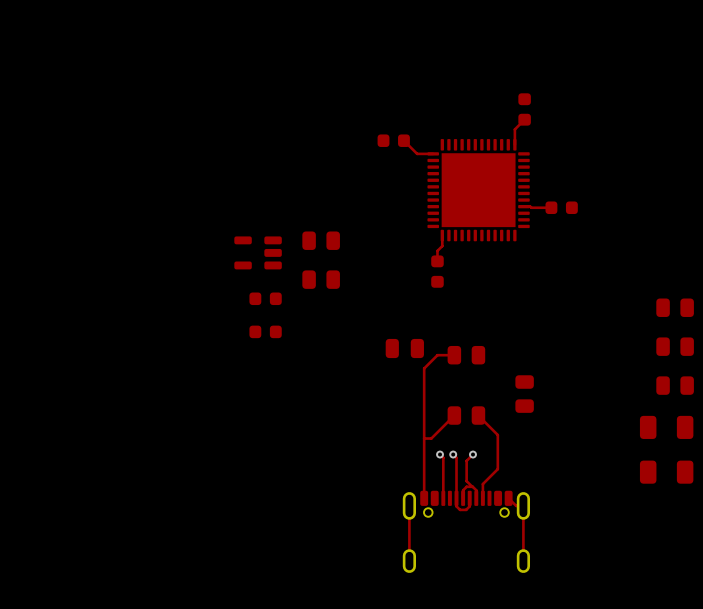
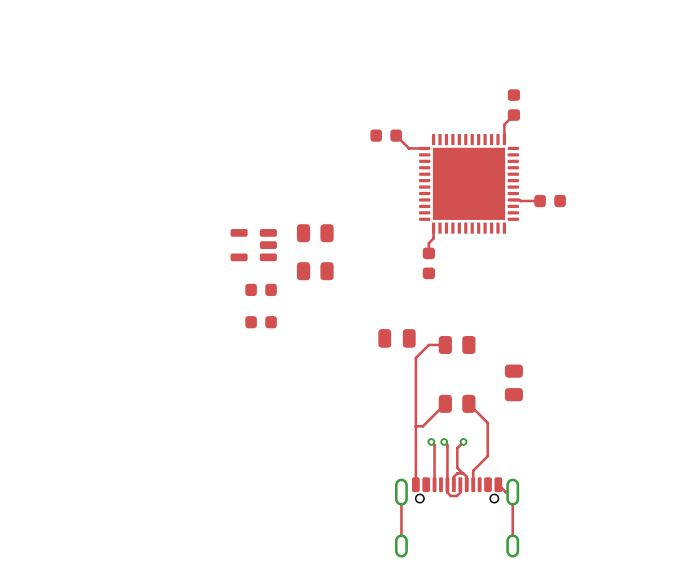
part: (675, 307) -> none
part: (675, 346) -> none
part: (675, 385) -> none
part: (666, 427) -> none
part: (666, 472) -> none

